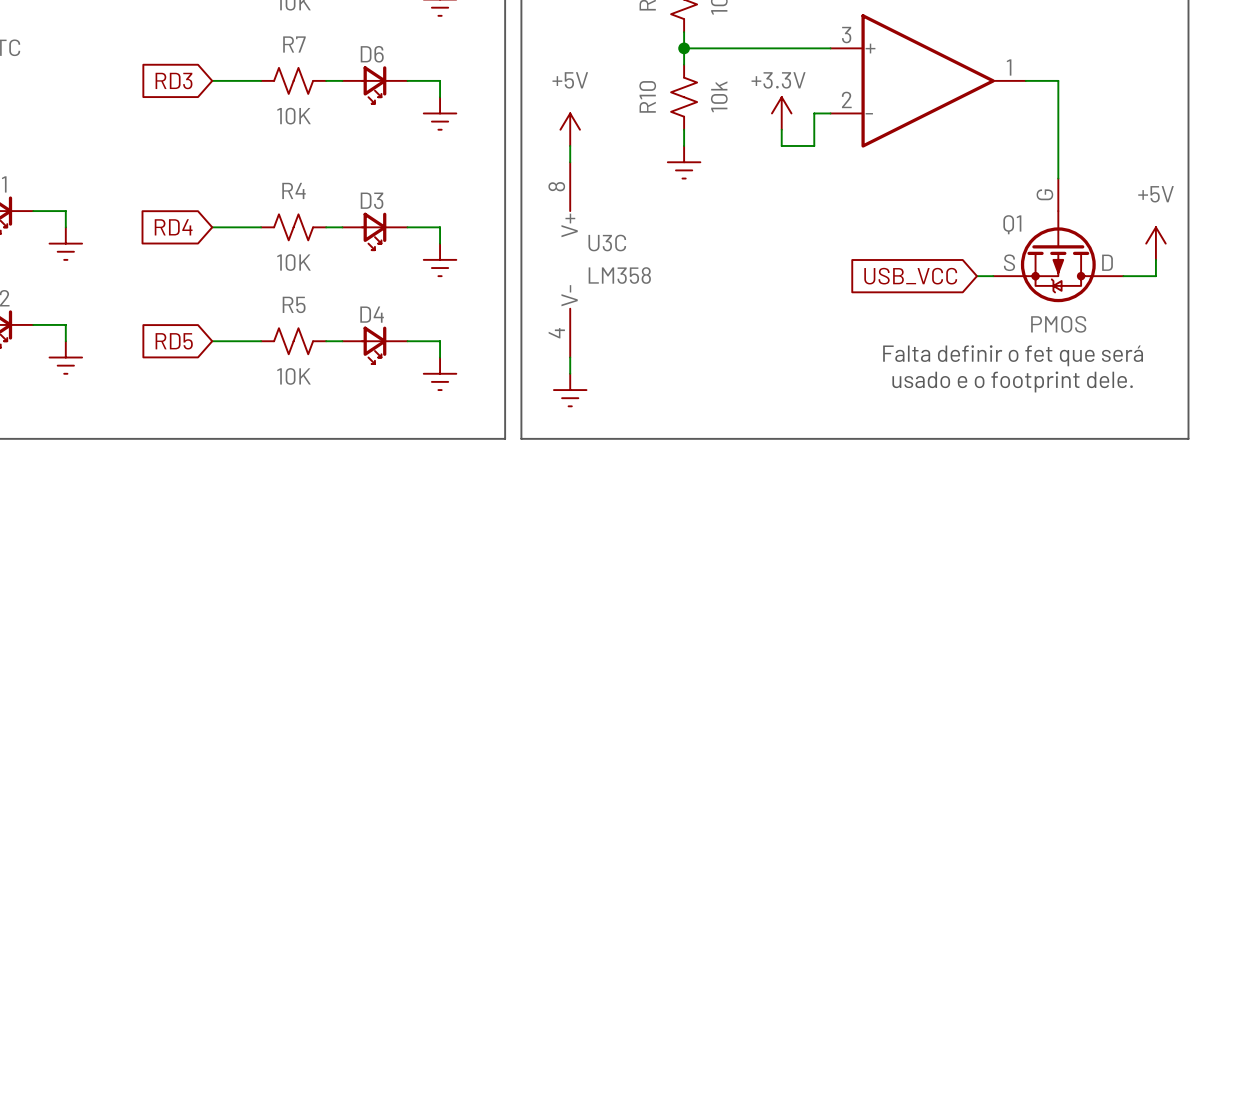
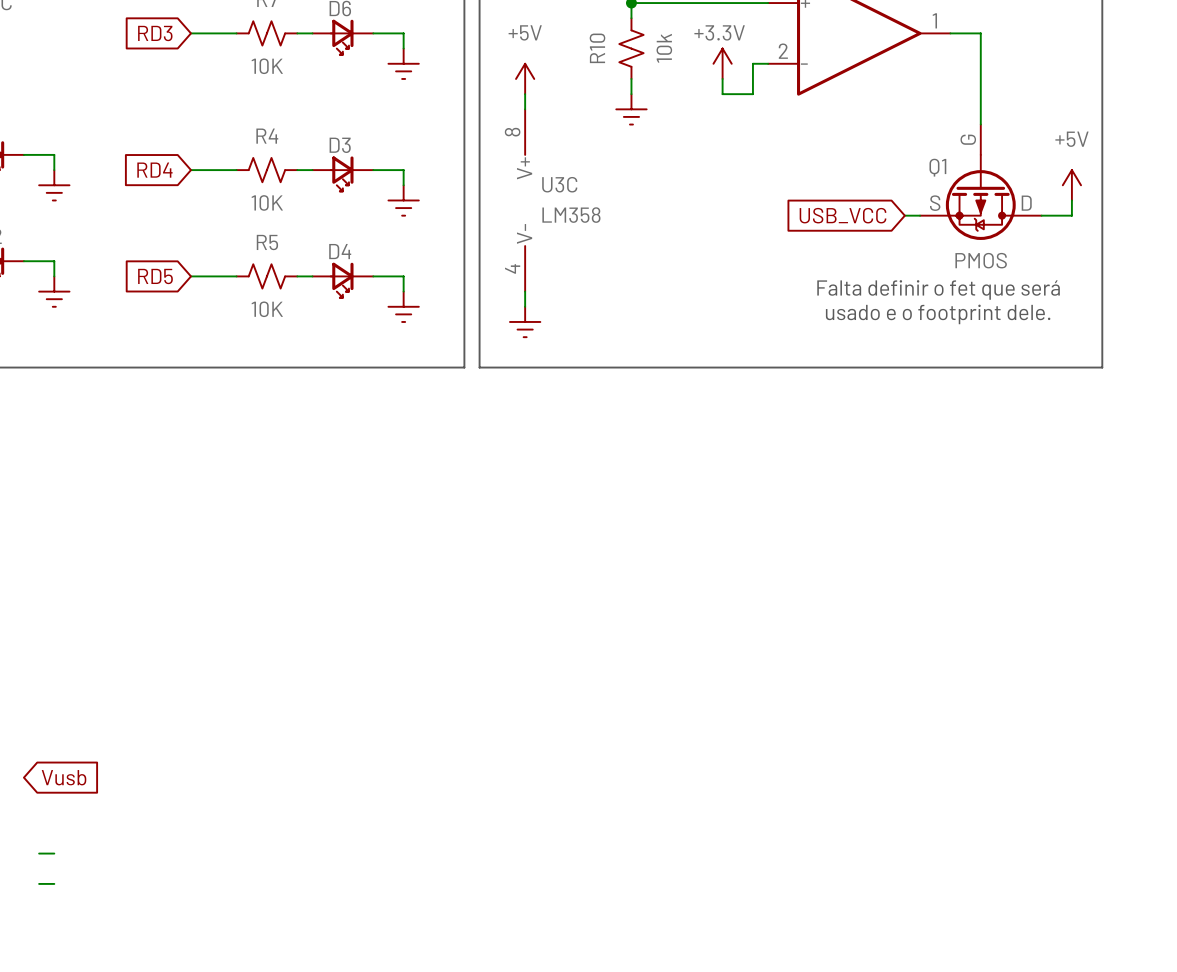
global label: none -> Vusb (64, 777)
wire: none -> (39, 853) (54, 853)
wire: none -> (39, 883) (54, 883)

